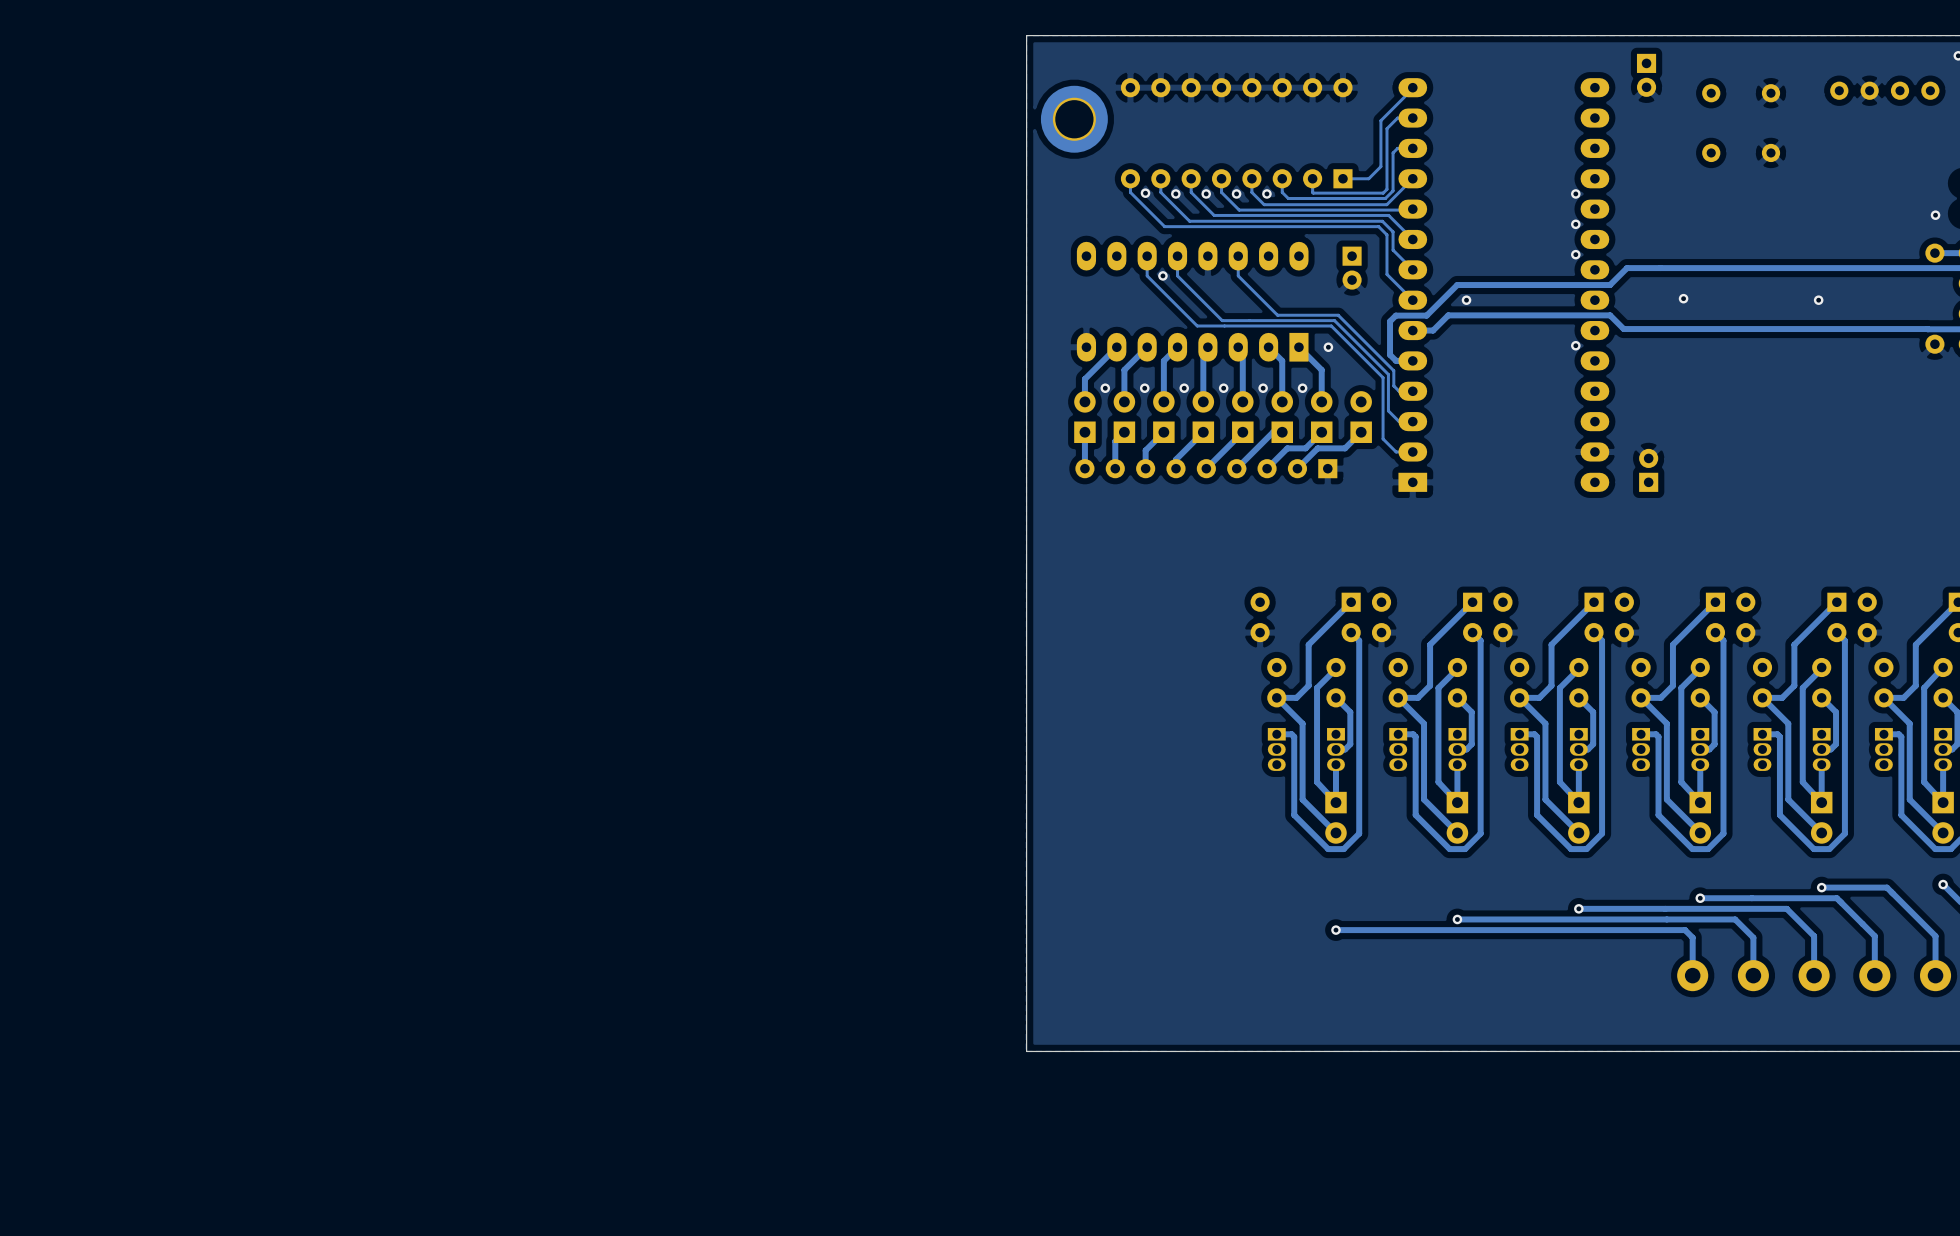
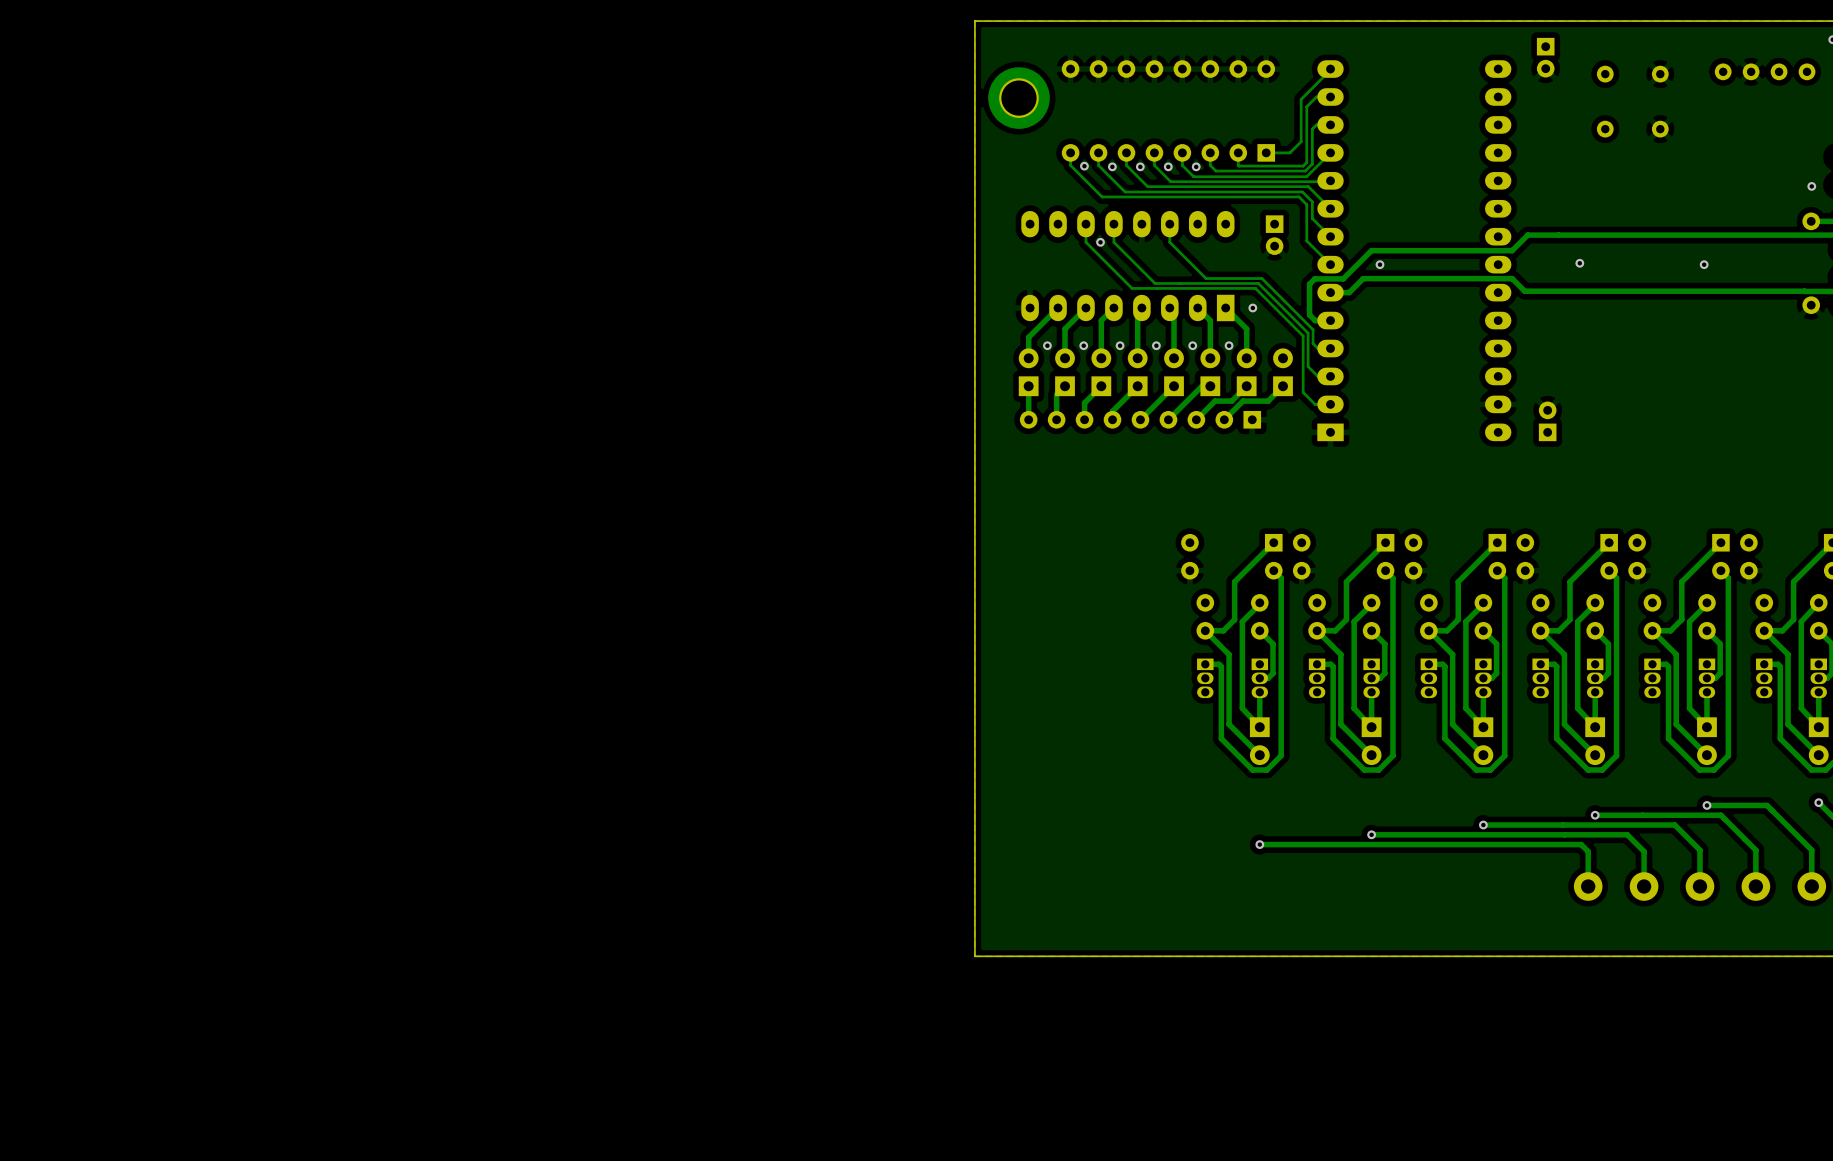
via: (1575, 193) -> none
via: (1575, 224) -> none
via: (1575, 254) -> none
via: (1575, 345) -> none

